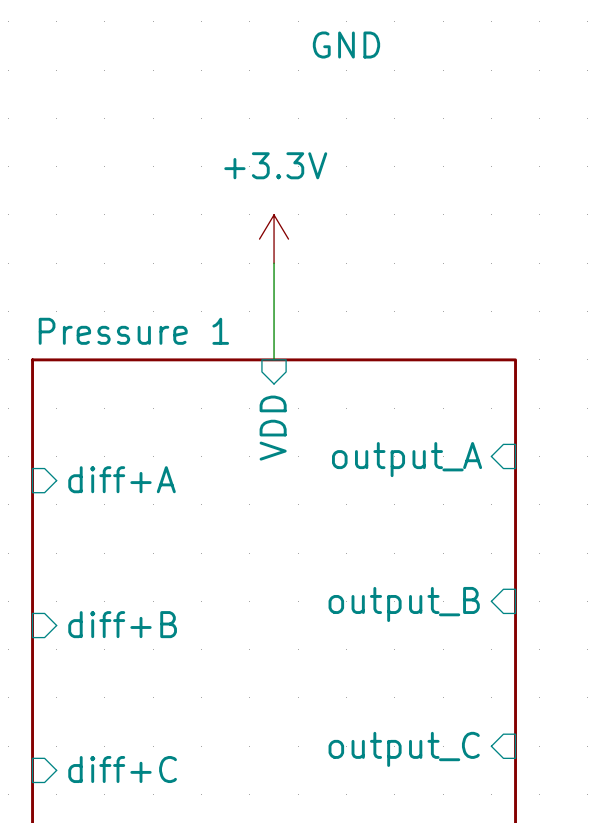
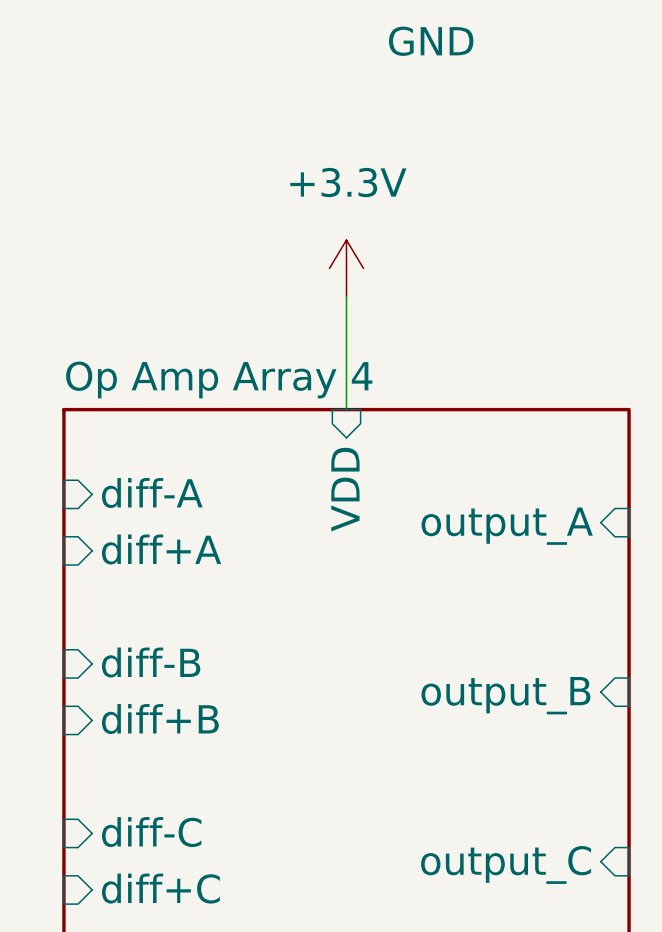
sheet Pressure 1 name: Pressure 1 (133, 331) -> Op Amp Array 4 (219, 379)
sheet pin: none -> diff-A (152, 493)
sheet pin: none -> diff-B (151, 662)
sheet pin: none -> diff-C (151, 832)

